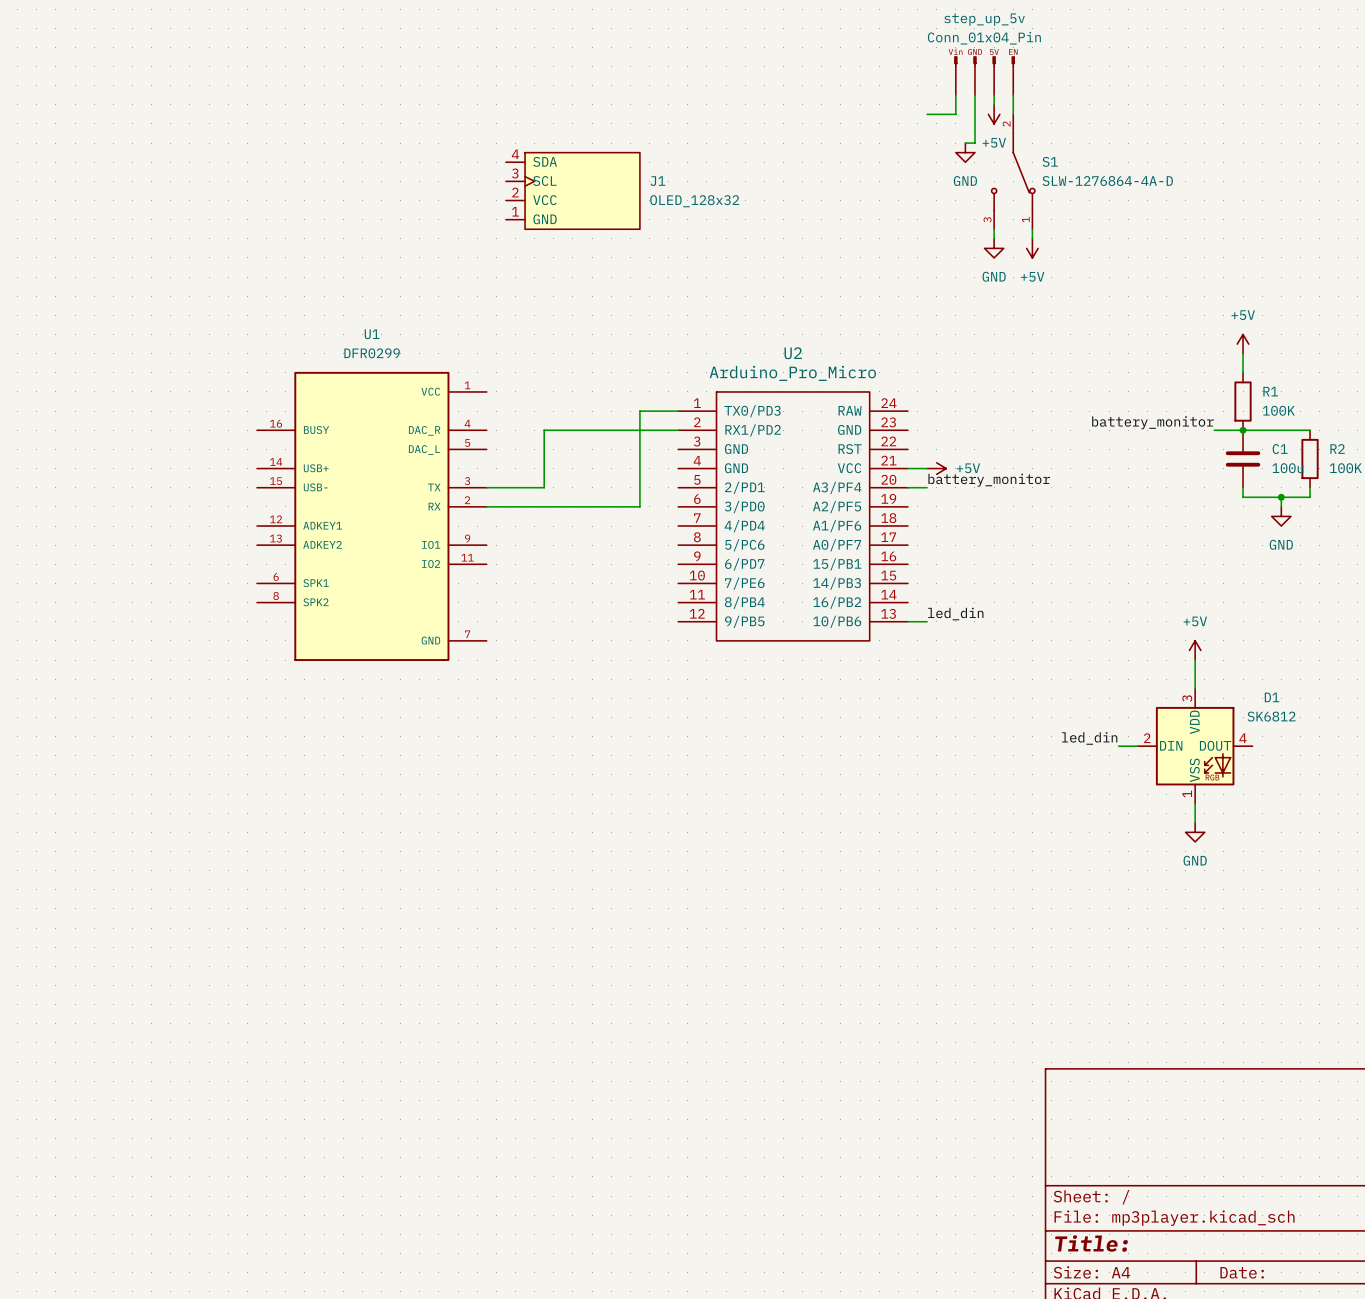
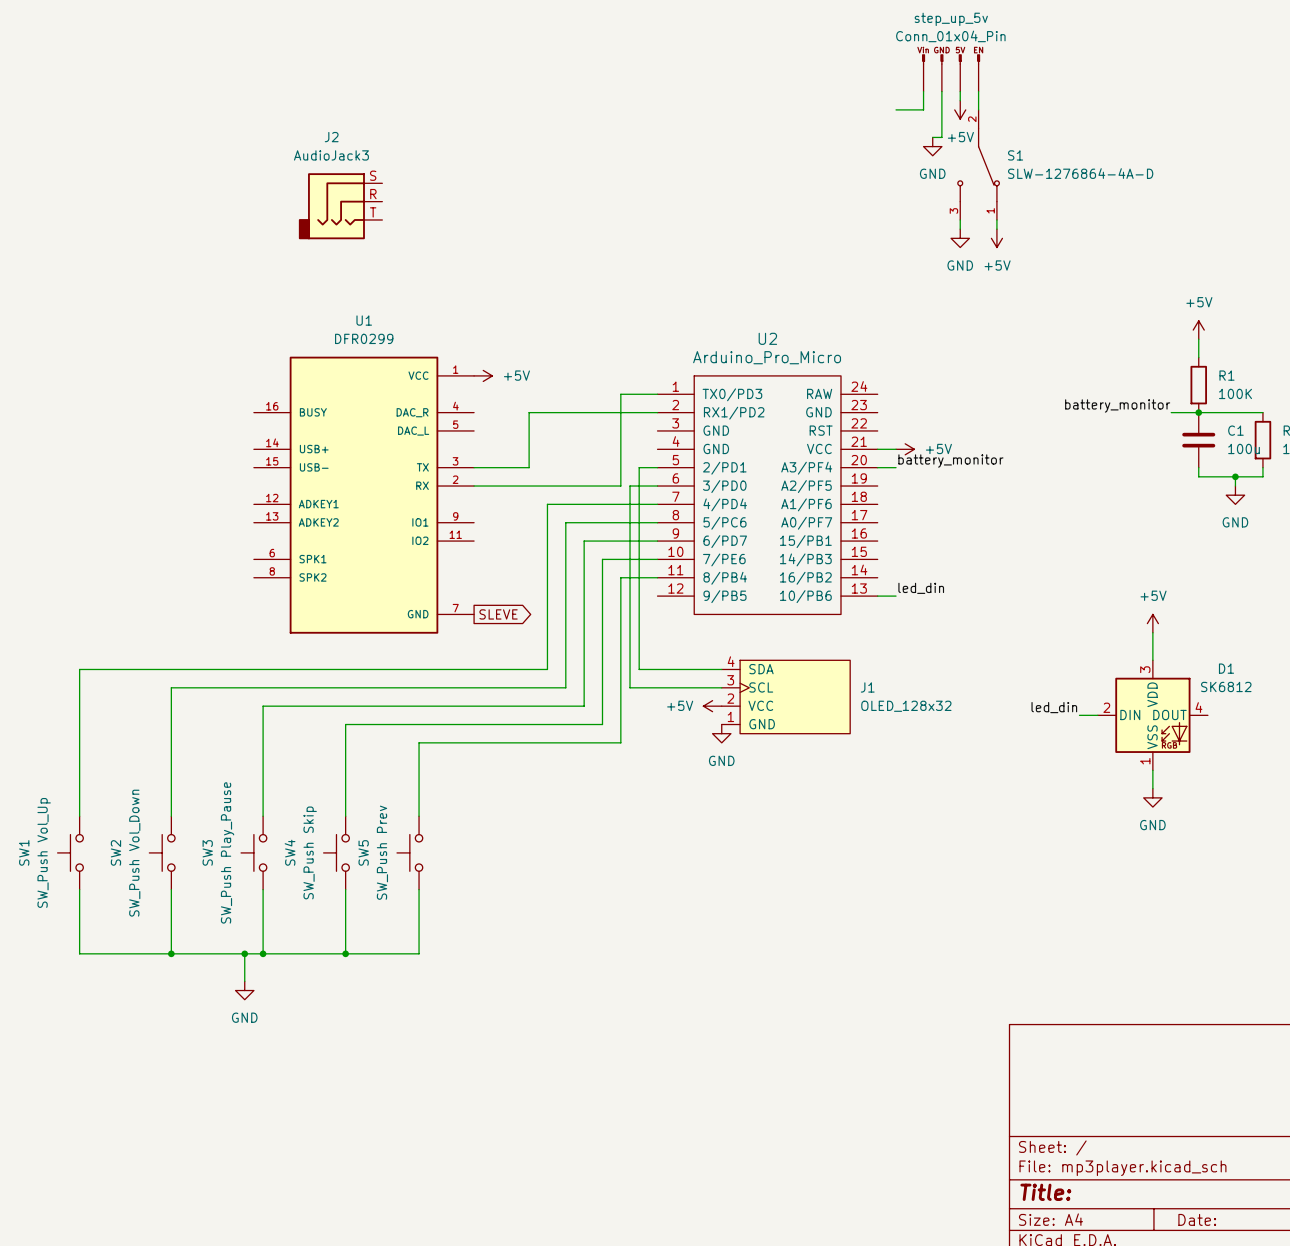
J1 position: (572, 190) -> (785, 696)
J2: none -> AudioJack3 (340, 206)
power symbol: none -> +5V (483, 375)
wire: none -> (657, 467) (639, 467) (639, 669) (721, 669)
wire: none -> (657, 486) (630, 486) (630, 687) (721, 687)
wire: none -> (657, 504) (547, 504) (547, 669) (79, 669) (79, 816)
wire: none -> (657, 522) (565, 522) (565, 687) (171, 687) (171, 816)
wire: none -> (657, 541) (584, 541) (584, 706) (263, 706) (263, 816)
wire: none -> (657, 559) (602, 559) (602, 724) (345, 724) (345, 816)
wire: none -> (657, 577) (620, 577) (620, 742) (419, 742) (419, 816)
global label: none -> SLEVE (498, 614)
power symbol: none -> +5V (712, 706)
power symbol: none -> GND (721, 733)
SW1: none -> SW_Push Vol_Up (70, 852)
SW2: none -> SW_Push Vol_Down (162, 852)
SW3: none -> SW_Push Play_Pause (253, 852)
SW4: none -> SW_Push Skip (336, 852)
SW5: none -> SW_Push Prev (409, 852)
wire: none -> (79, 889) (79, 953) (419, 953) (419, 889)
wire: none -> (171, 889) (171, 953)
wire: none -> (263, 889) (263, 953)
wire: none -> (345, 889) (345, 953)
junction: none -> (171, 953)
wire: none -> (244, 953) (244, 981)
junction: none -> (244, 953)
junction: none -> (263, 953)
junction: none -> (345, 953)
power symbol: none -> GND (244, 990)

